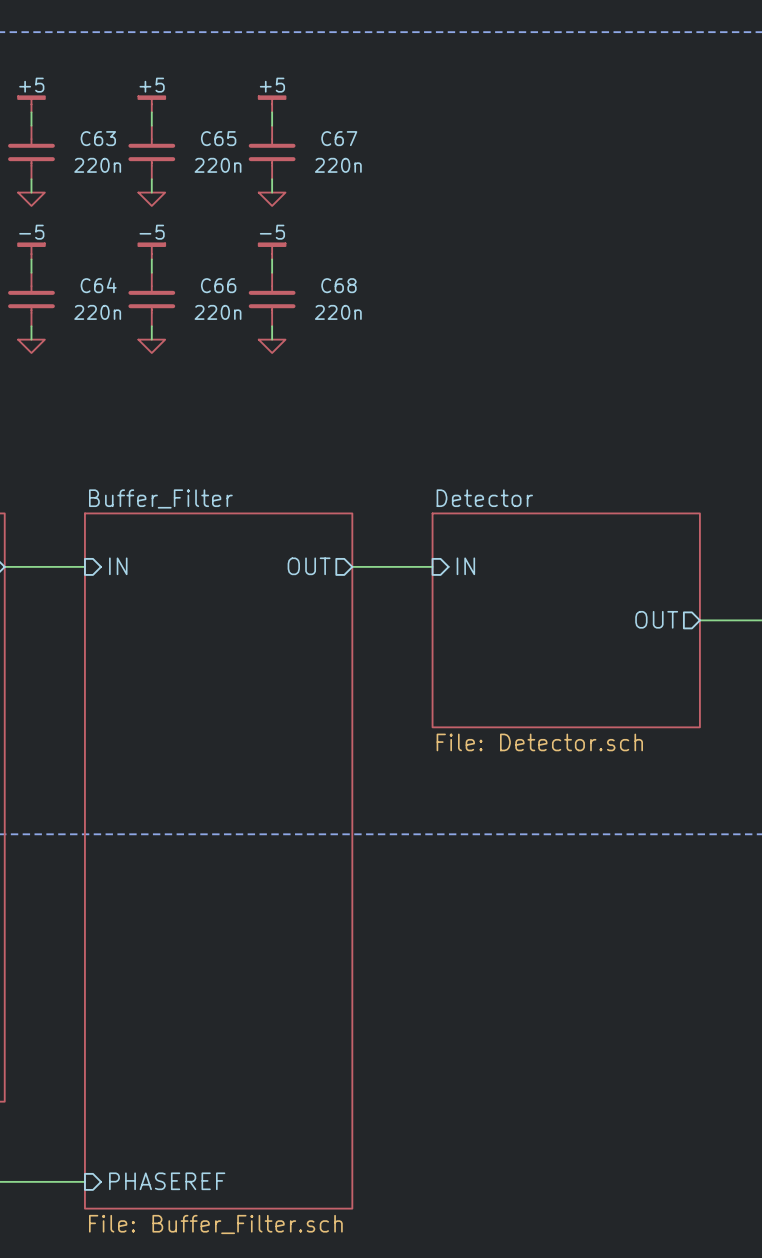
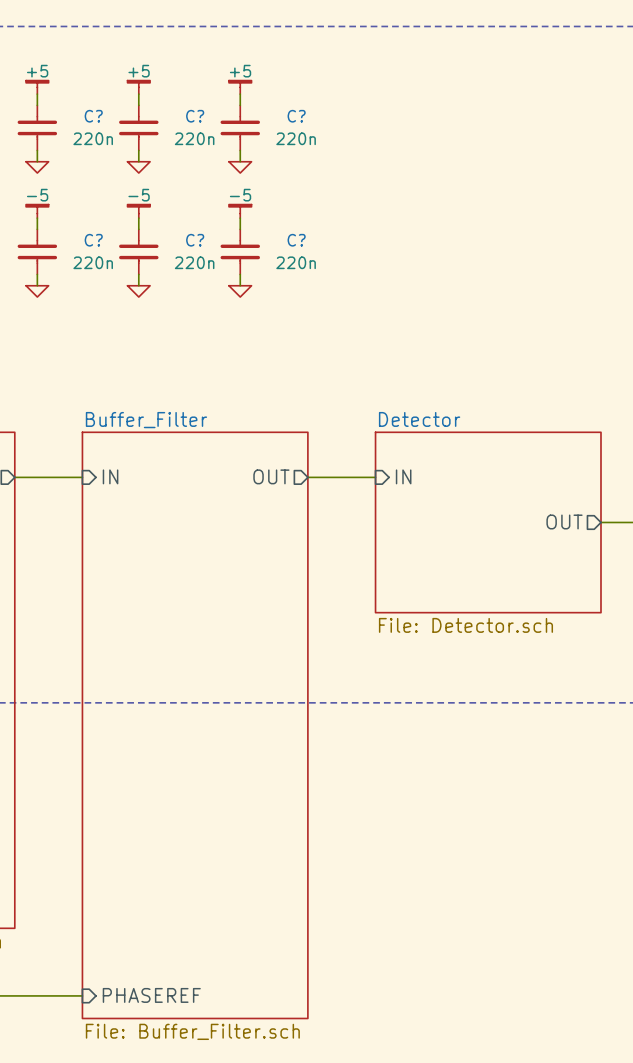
C63 name: C63 (98, 138) -> C? (93, 116)
C65 name: C65 (218, 138) -> C? (195, 116)
C67 name: C67 (339, 138) -> C? (296, 116)
C64 name: C64 (98, 285) -> C? (93, 240)
C66 name: C66 (218, 285) -> C? (195, 240)
C68 name: C68 (338, 285) -> C? (296, 240)

